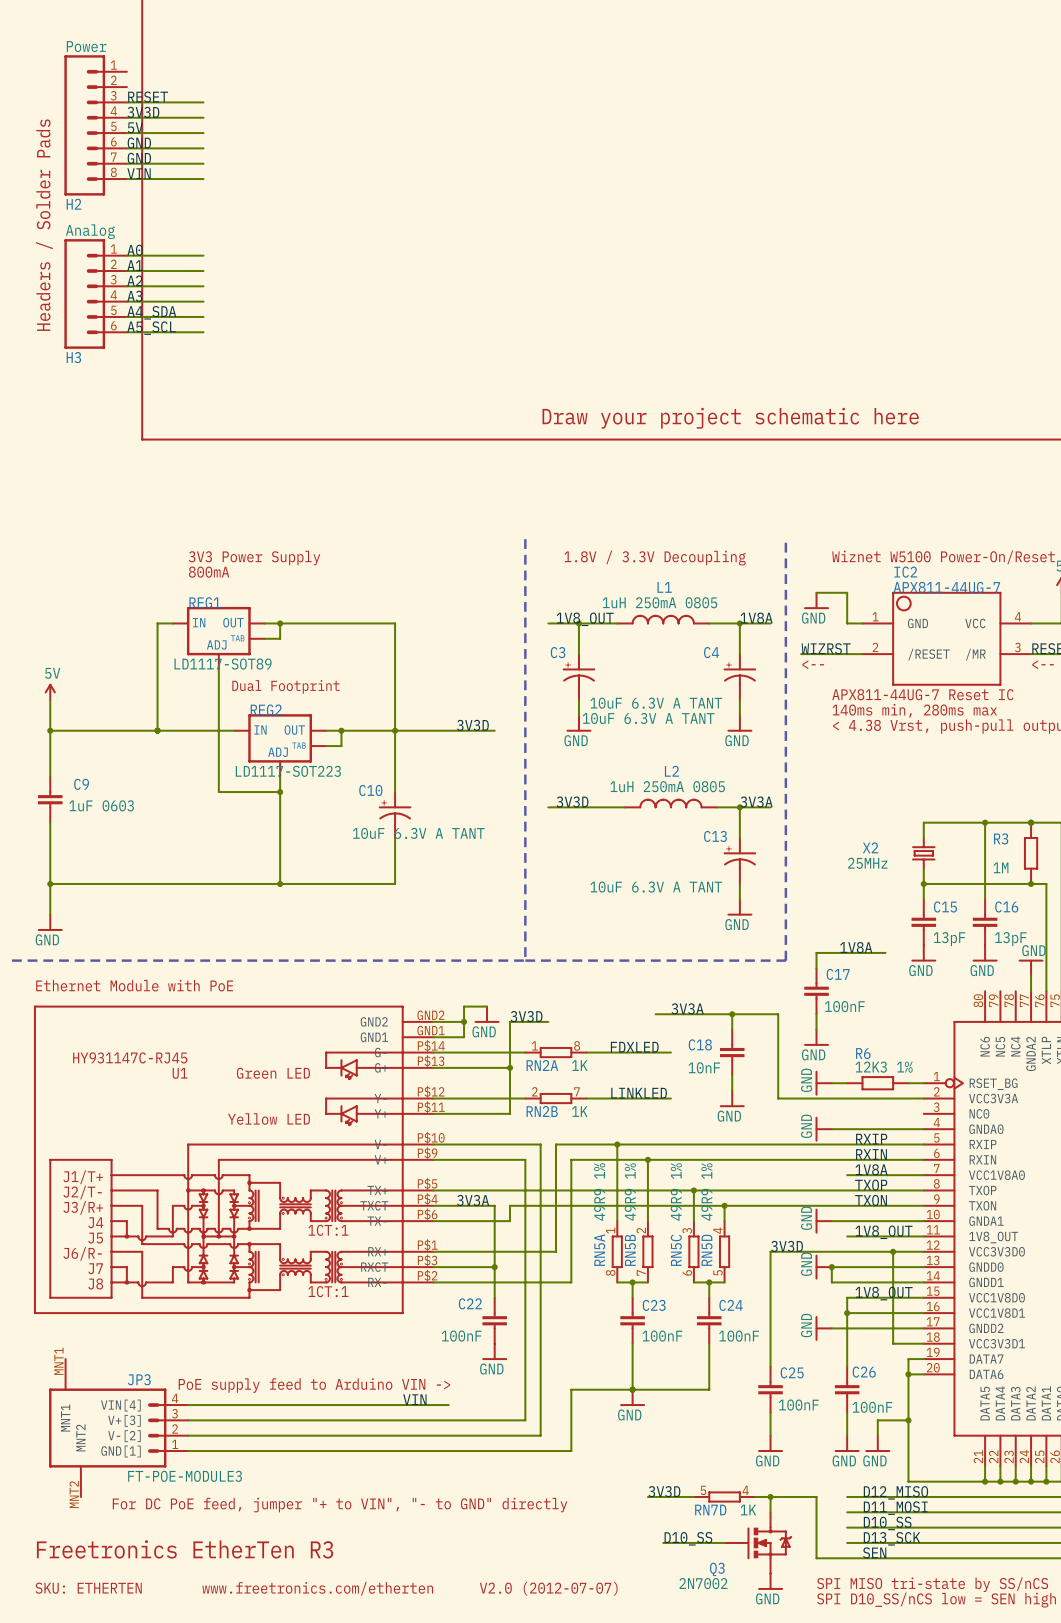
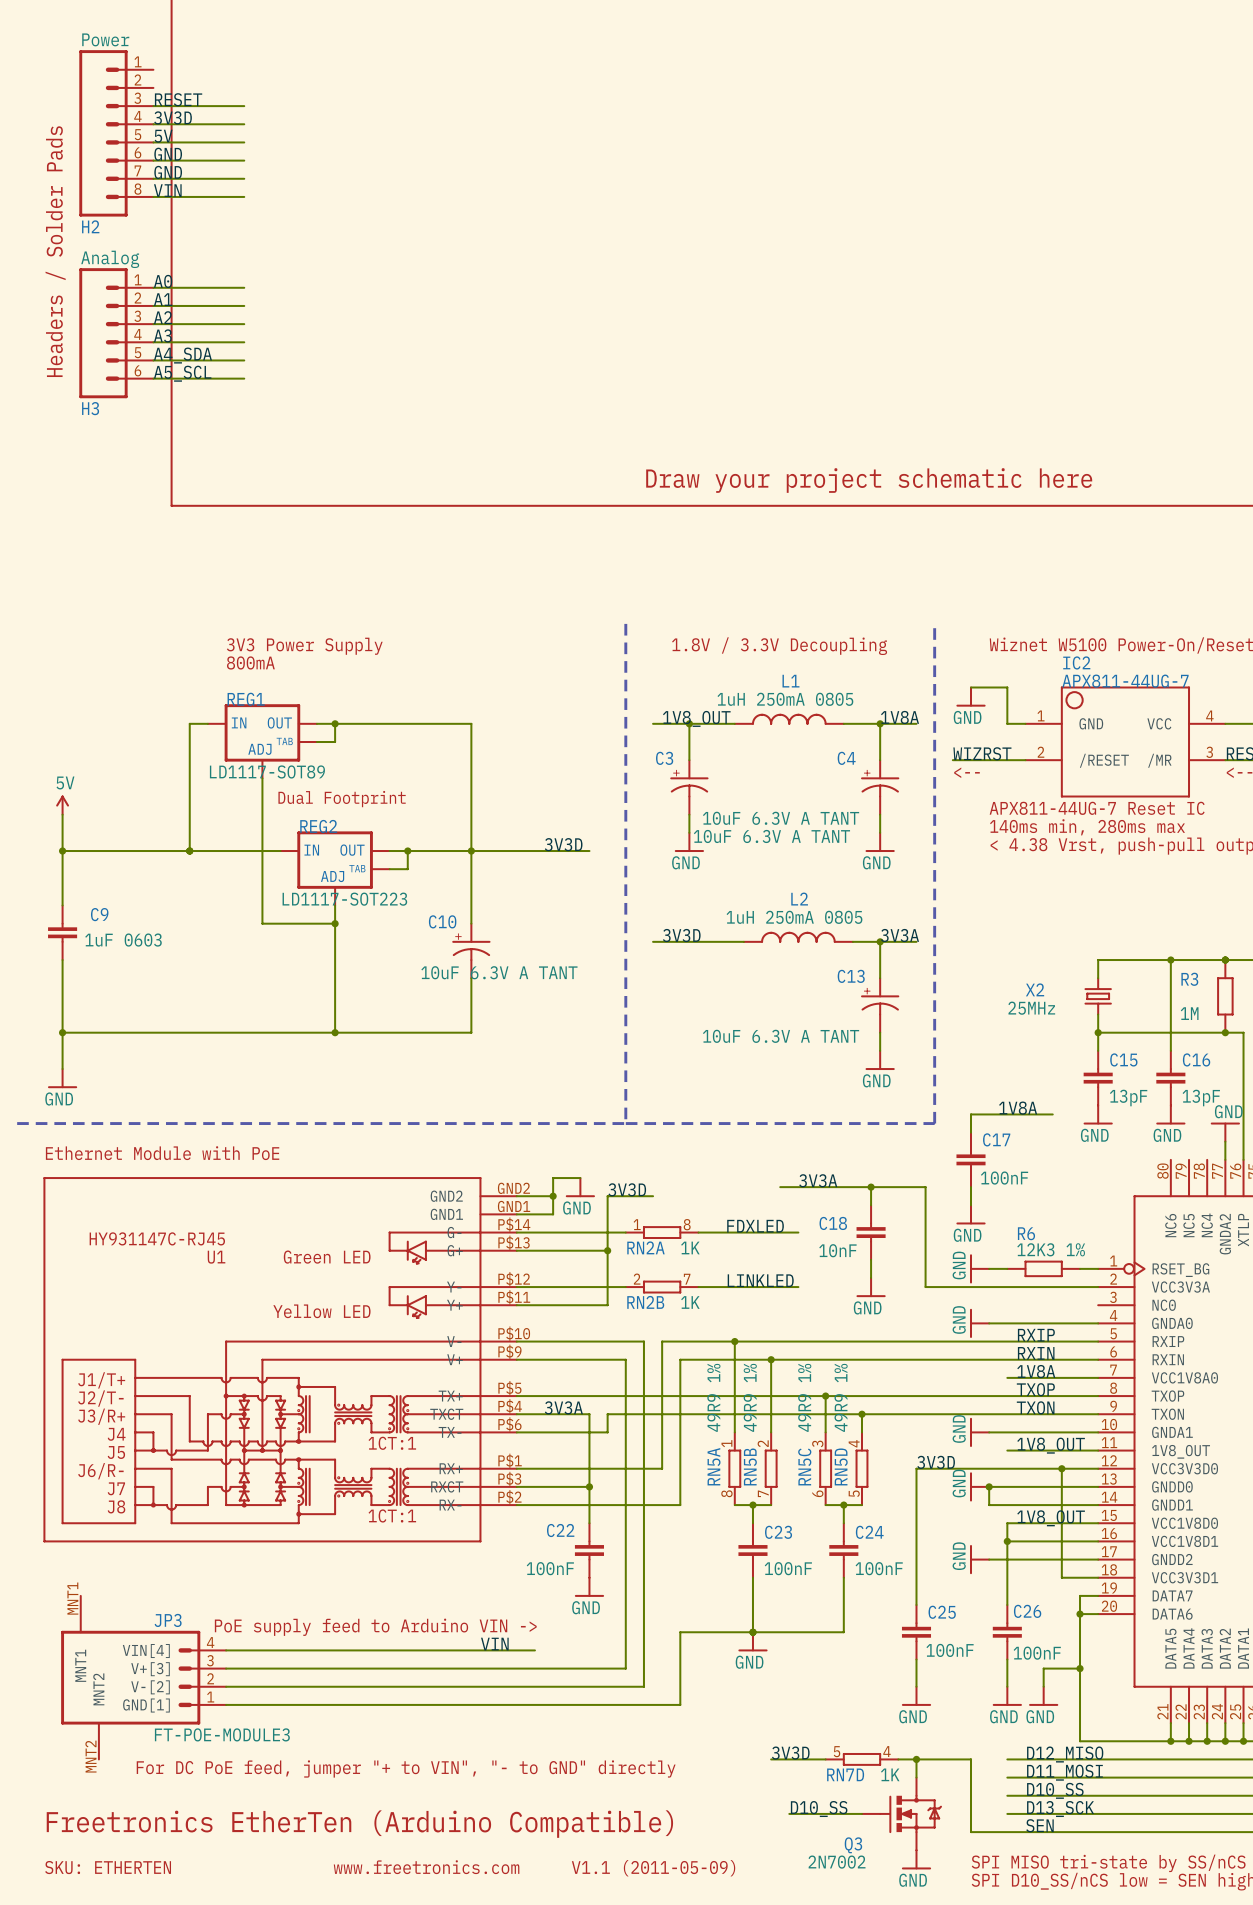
text: Freetronics EtherTen R3 (185, 1549) -> Freetronics EtherTen (Arduino Compatible) (359, 1824)
text: www.freetronics.com/etherten (317, 1588) -> www.freetronics.com (426, 1867)
text: V2.0 (2012-07-07) (548, 1588) -> V1.1 (2011-05-09) (653, 1868)

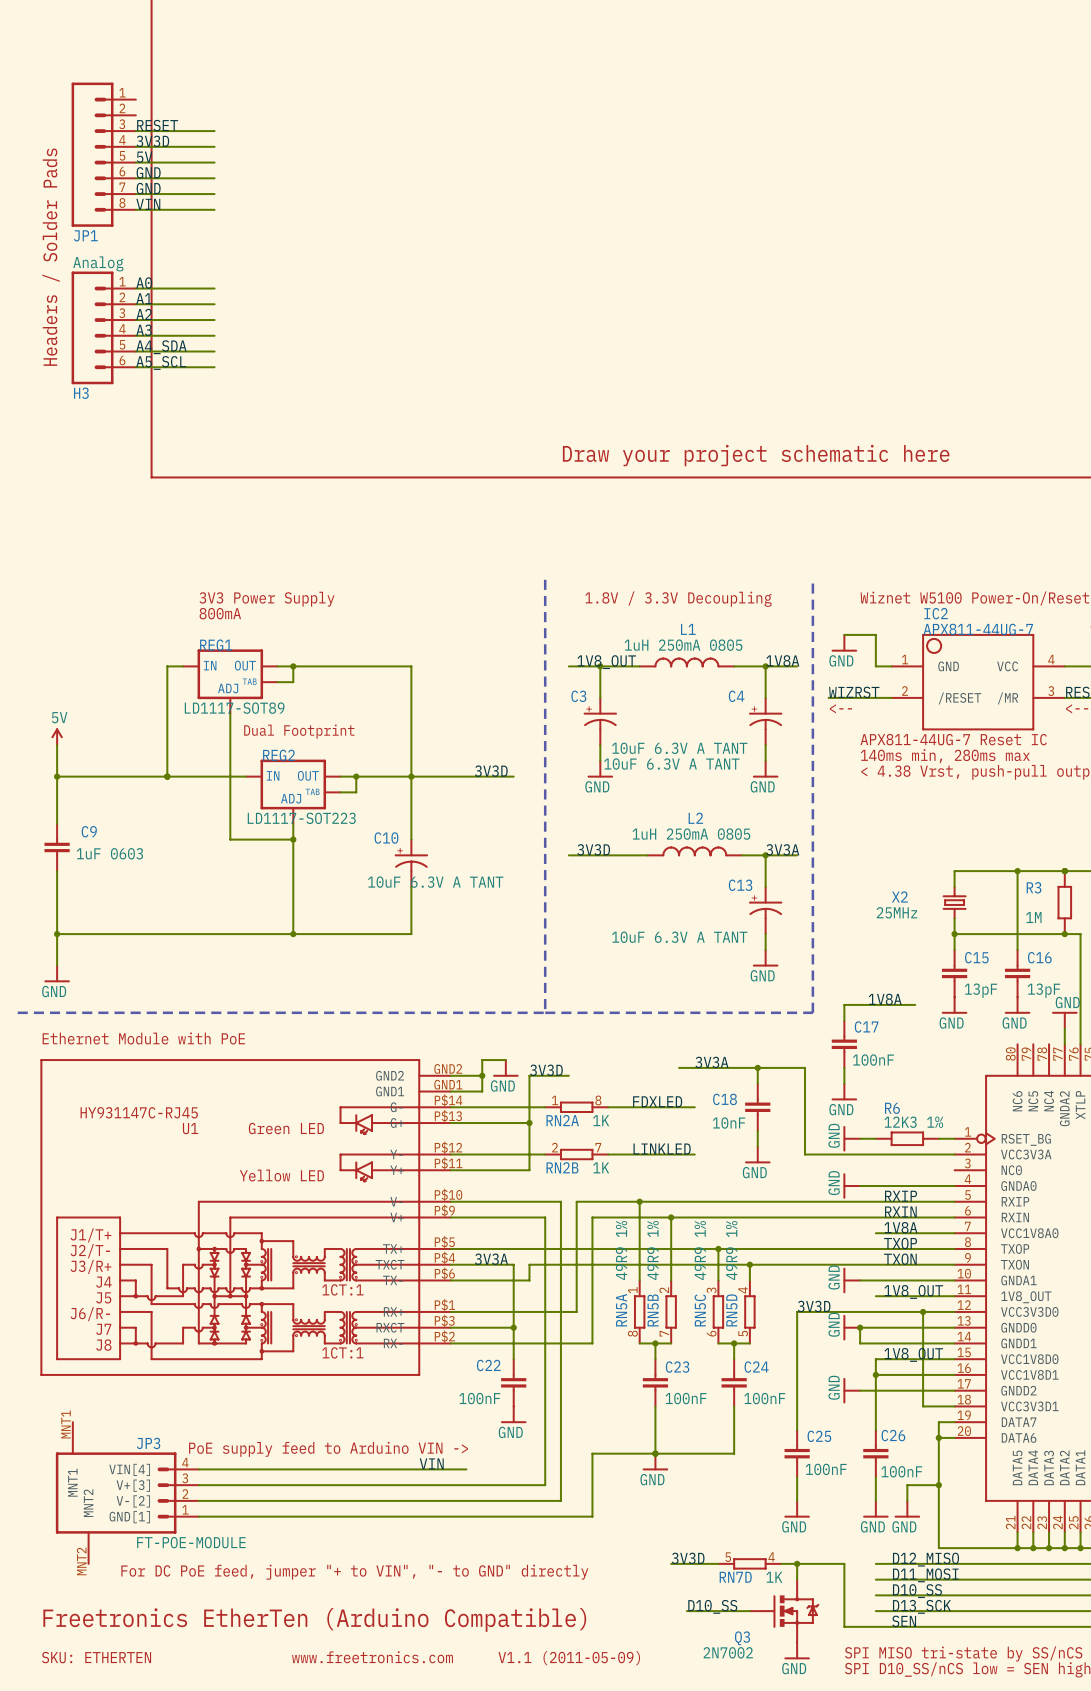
H2 value: Power (105, 39) -> none
H2 name: H2 (90, 226) -> JP1 (85, 235)
JP3 value: FT-POE-MODULE3 (222, 1734) -> FT-POE-MODULE (191, 1542)

